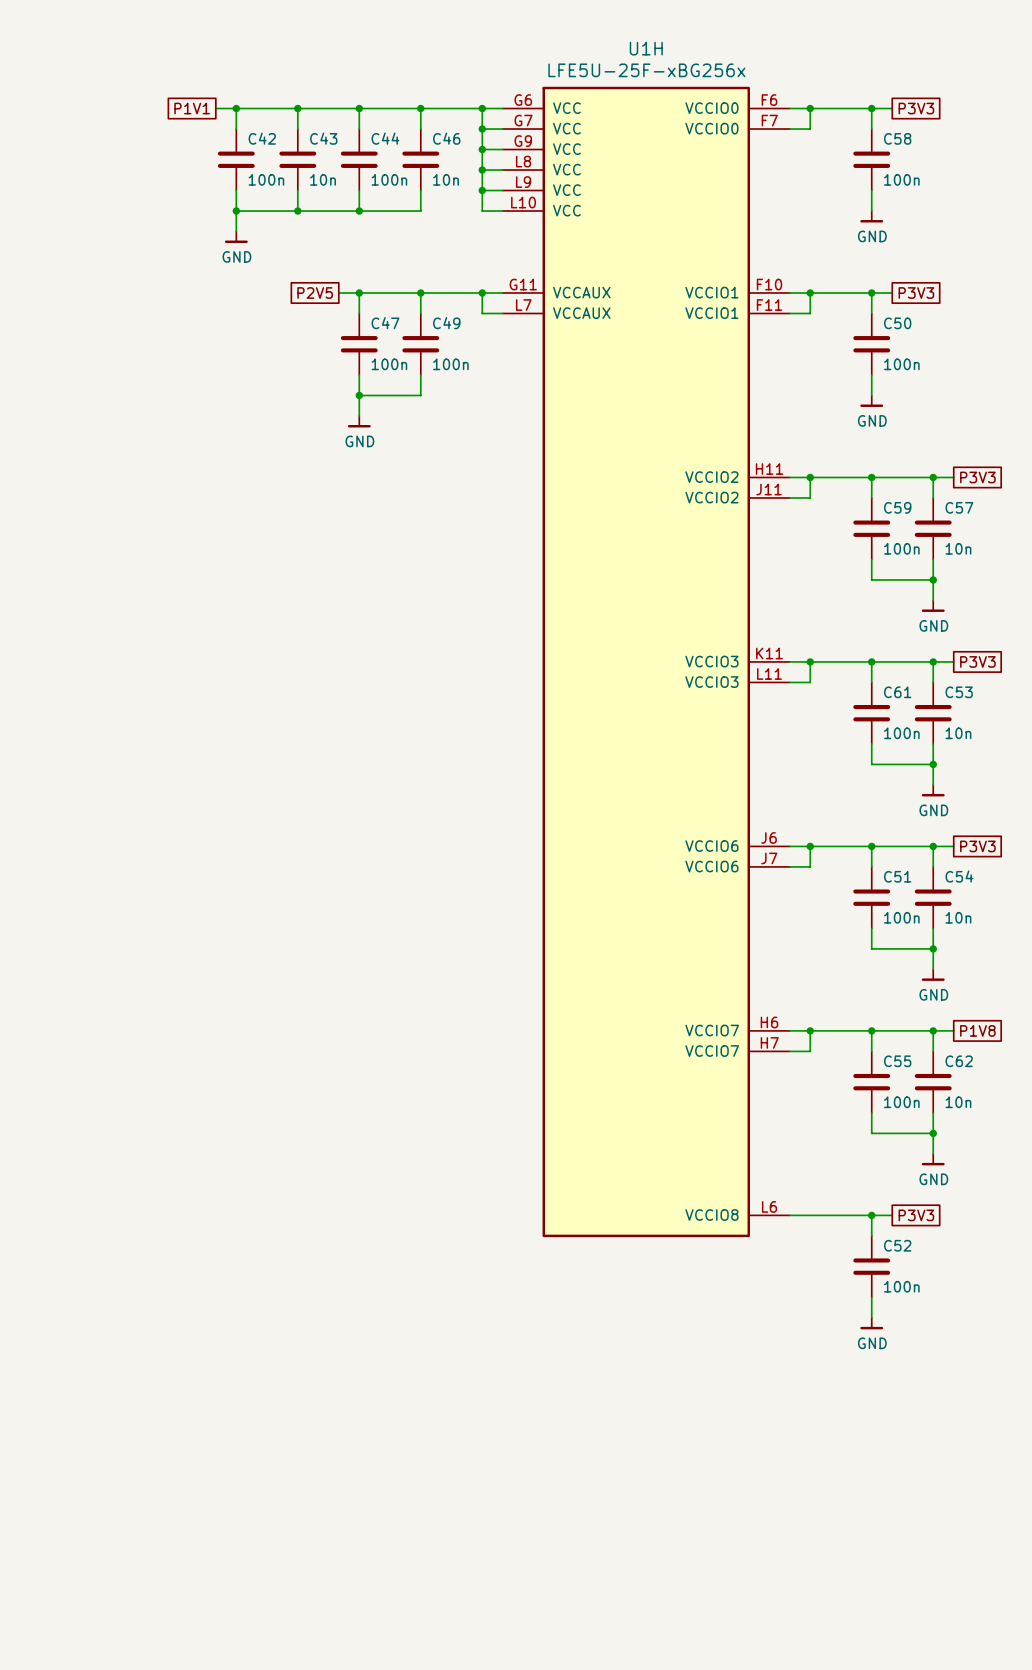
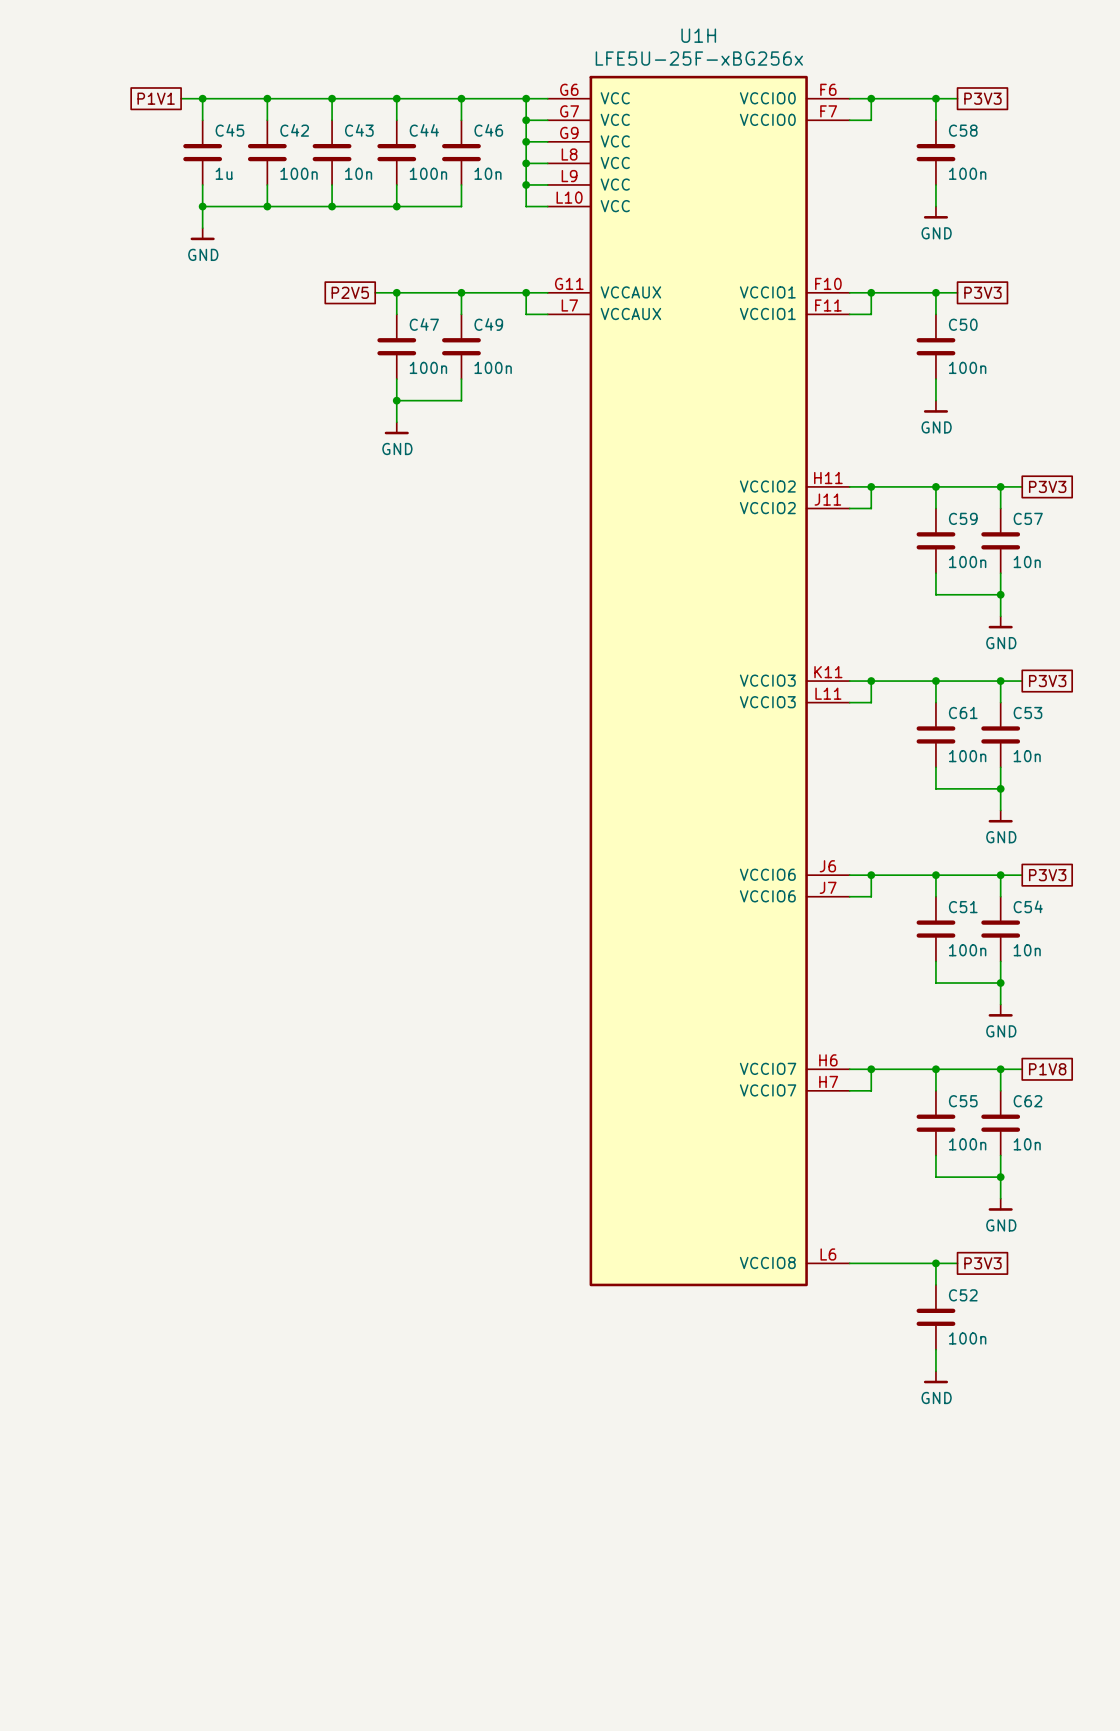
wire: none -> (181, 98) (245, 98)
wire: none -> (202, 98) (202, 120)
junction: none -> (202, 98)
global label position: P1V1 (192, 108) -> P1V1 (156, 98)
C45: none -> 1u (202, 152)
wire: none -> (202, 184) (202, 228)
junction: none -> (202, 206)
wire: (236, 211) (236, 231) -> (267, 206) (202, 206)
power symbol position: GND (236, 237) -> GND (202, 234)

